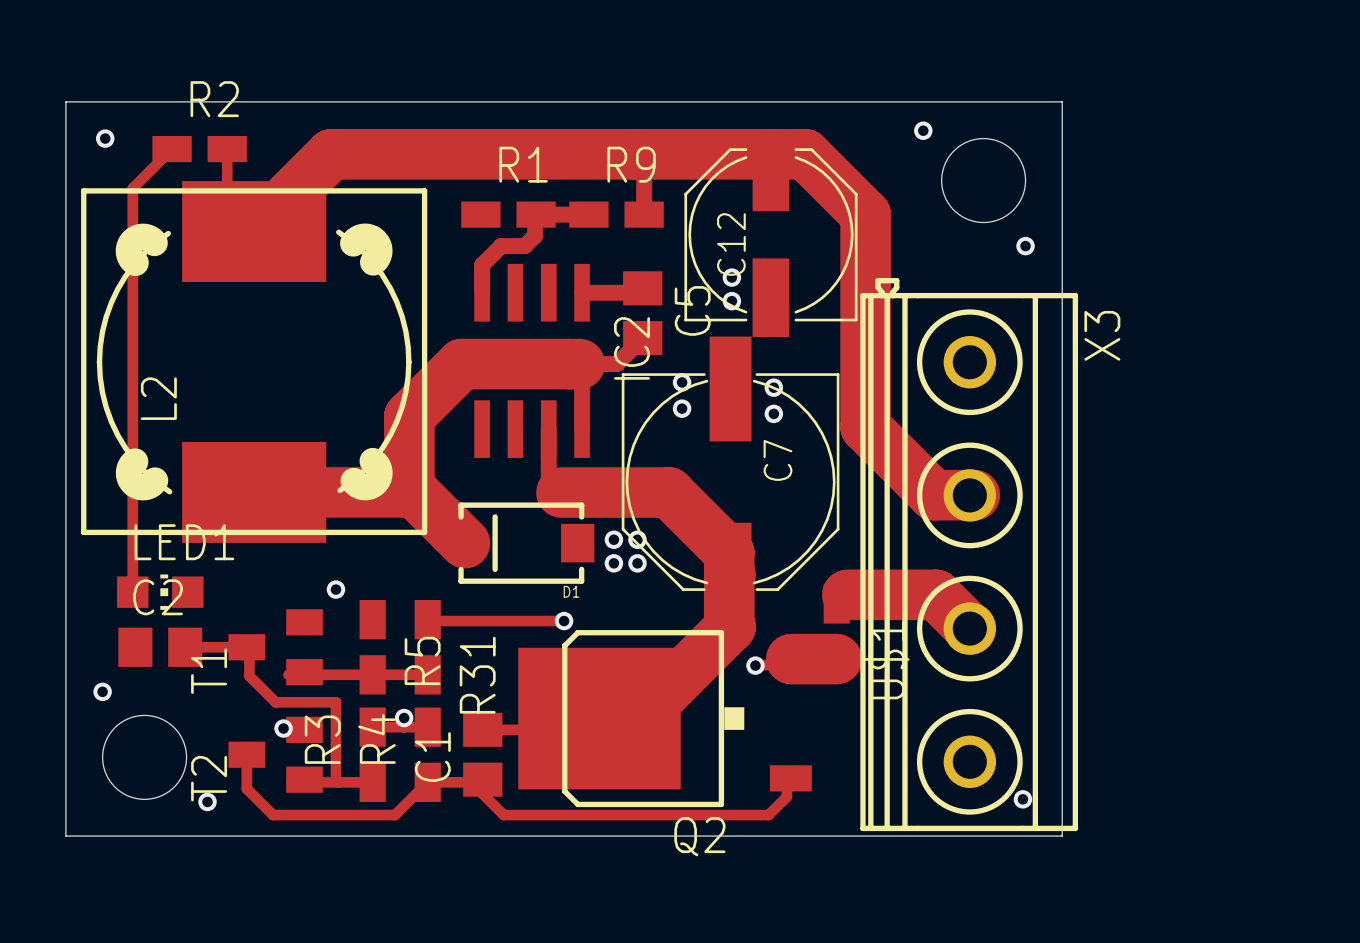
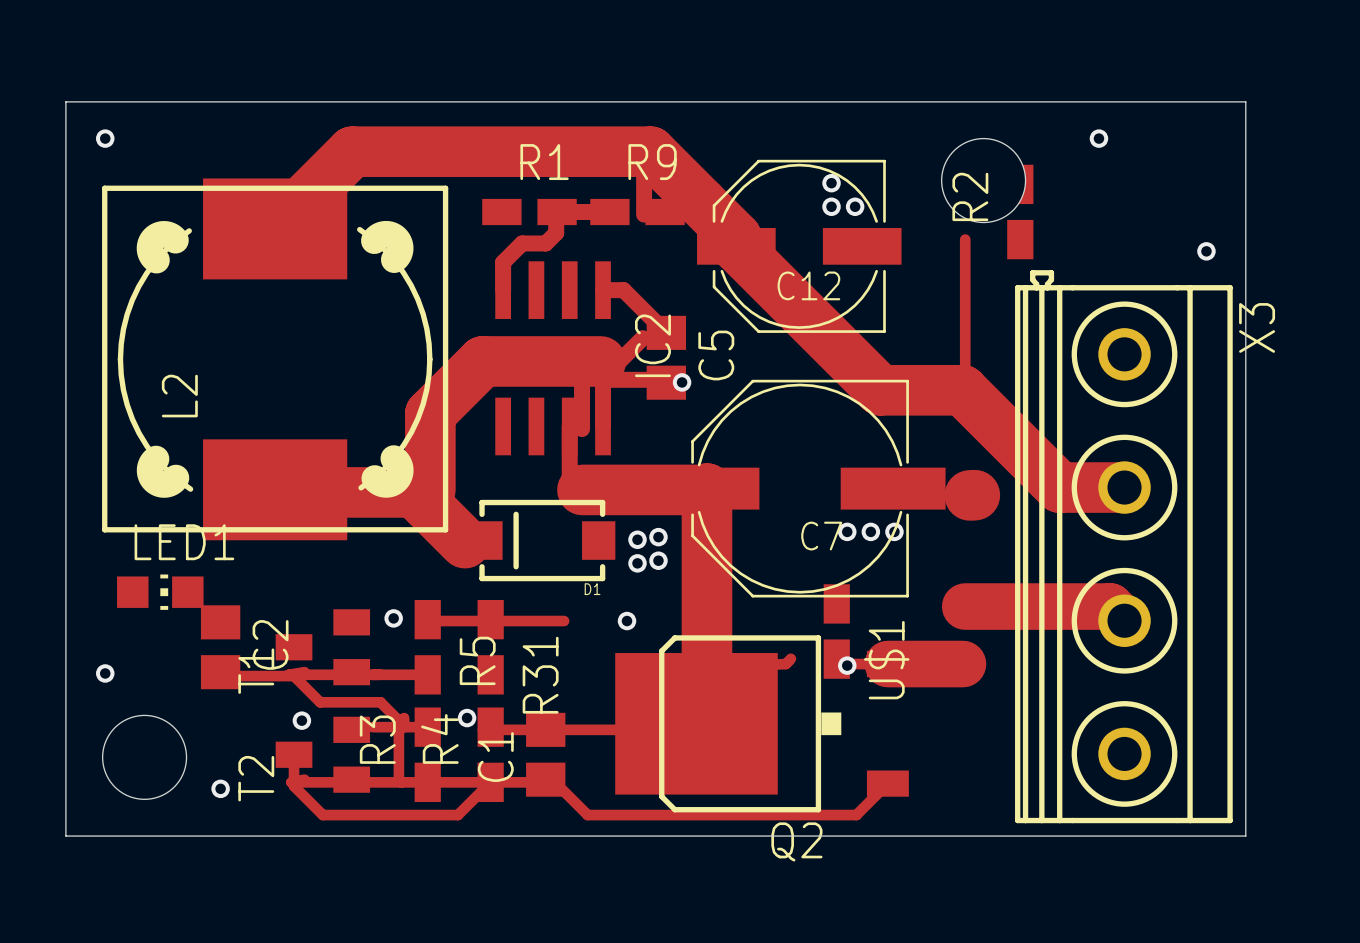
R2 name position: R2 (214, 99) -> R2 (970, 196)
board edge: (1062, 101) (1062, 836) -> (1062, 101) (1245, 101) (1245, 836) (1062, 836)
via: (923, 130) -> none
via: none -> (1098, 138)
track: (172, 149) (132, 188) (132, 592) -> none
R2 rotation: 0° (199, 149) -> 90° clockwise (1020, 212)
R2 position: (199, 149) -> (1020, 212)
track: (227, 149) (227, 218) (238, 230) (254, 231) (331, 154) (805, 154) (865, 214) (865, 427) (933, 495) (969, 495) -> none
via: none -> (831, 183)
via: none -> (831, 206)
via: none -> (855, 206)
R1 position: (508, 214) -> (529, 212)
track: (588, 214) (536, 214) (535, 235) (524, 246) (501, 246) (482, 265) (482, 292) -> (609, 212) (557, 212) (556, 232) (545, 243) (522, 243) (503, 262) (503, 290)
R9 position: (616, 214) -> (637, 212)
track: none -> (275, 228) (352, 151) (650, 151) (736, 237) (736, 246) (880, 390) (962, 390)
C12 rotation: 0° (770, 234) -> 90° counterclockwise (799, 246)
track: none -> (965, 239) (965, 387) (962, 390)
via: (1025, 246) -> none
via: none -> (1206, 251)
via: (731, 277) -> none
track: (642, 288) (638, 292) (582, 292) -> none
track: none -> (603, 290) (623, 290) (666, 332)
via: (731, 301) -> none
C5 position: (642, 313) -> (666, 357)
IC2 position: (532, 360) -> (553, 358)
L2 position: (254, 361) -> (275, 359)
track: (579, 364) (461, 364) (409, 416) (409, 492) -> none
track: none -> (603, 379) (663, 379) (666, 382)
via: (773, 387) -> none
track: none -> (962, 390) (1059, 487) (1124, 487)
via: (682, 408) -> none
via: (773, 413) -> none
track: none -> (569, 426) (569, 477) (582, 489) (706, 488) (706, 744) (687, 744)
track: none -> (603, 426) (603, 361) (482, 361) (430, 413) (430, 489)
track: (548, 429) (548, 479) (561, 492) (668, 492) (729, 552) (730, 626) (632, 725) -> none
C7 rotation: 0° (730, 482) -> 90° clockwise (800, 488)
via: none -> (847, 531)
via: none -> (870, 531)
via: none -> (894, 531)
via: none -> (658, 537)
via: (613, 539) -> none
D1 position: (521, 543) -> (542, 540)
X3 position: (969, 554) -> (1123, 546)
via: none -> (658, 560)
via: (613, 563) -> none
via: (335, 589) -> none
track: (836, 603) (847, 594) (936, 594) (969, 628) -> none
track: none -> (965, 606) (1110, 606) (1124, 620)
via: none -> (393, 618)
via: (564, 621) -> none
via: none -> (627, 621)
C2 rotation: 0° (160, 647) -> 90° clockwise (220, 647)
C2 position: (160, 647) -> (220, 647)
track: (185, 647) (246, 647) (249, 649) (249, 676) (275, 702) (320, 702) -> (220, 672) (224, 676) (294, 676) (320, 702)
T1 position: (275, 647) -> (322, 647)
R5: (372, 647) -> none
R31: none -> (490, 647)
track: (791, 659) (836, 659) -> none
track: none -> (965, 661) (962, 664) (848, 664) (847, 665)
via: (755, 665) -> none
via: none -> (847, 665)
R31 name: R31 (477, 675) -> R5 (477, 660)
via position: (102, 691) -> (105, 673)
track: (335, 702) (335, 779) (338, 782) -> (335, 702) (380, 702) (398, 720) (398, 779) (401, 782)
via: (404, 718) -> none
via: none -> (467, 718)
Q2 position: (665, 718) -> (762, 723)
via position: (283, 728) -> (301, 720)
R4 name: R4 (377, 738) -> R3 (377, 739)
track: (246, 754) (246, 788) (273, 815) (322, 815) -> (294, 754) (294, 786) (322, 815)
T2 position: (275, 754) -> (322, 754)
R3: (372, 754) -> none
C1 position: (482, 754) -> (545, 754)
R4: none -> (490, 754)
track: (790, 778) (786, 777) (786, 796) (768, 815) -> (887, 783) (856, 815) (768, 815)
track: (489, 779) (482, 779) (482, 794) (503, 815) (587, 815) -> (395, 815) (457, 815) (490, 782) (543, 782) (545, 779) (552, 779) (587, 815)
track: (427, 782) (395, 815) -> (427, 782) (372, 782)
via: (1022, 799) -> none
via position: (207, 801) -> (220, 788)

